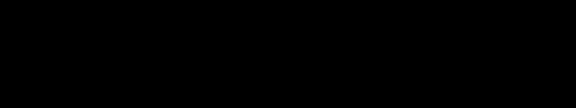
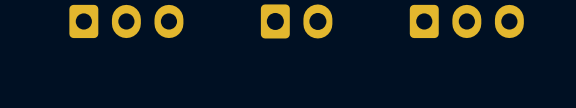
part: none -> (126, 21)
part: none -> (296, 21)
part: none -> (466, 21)

